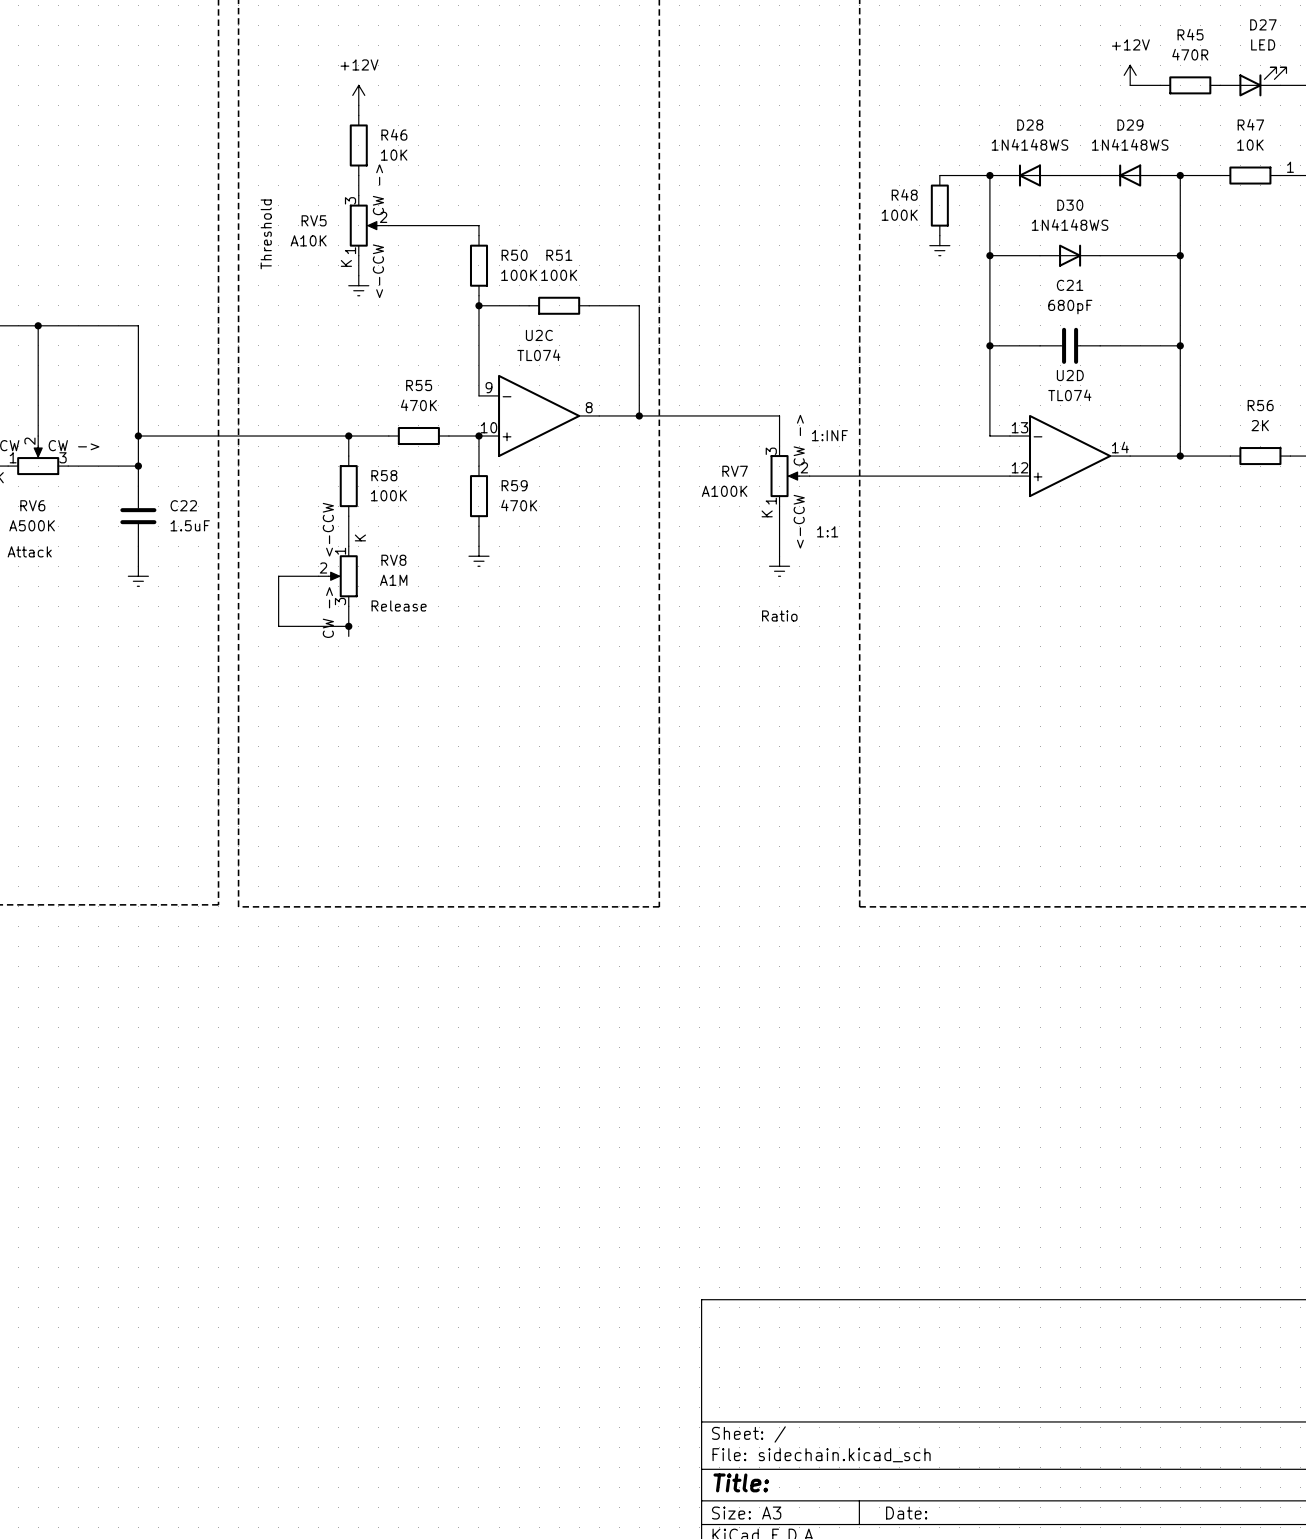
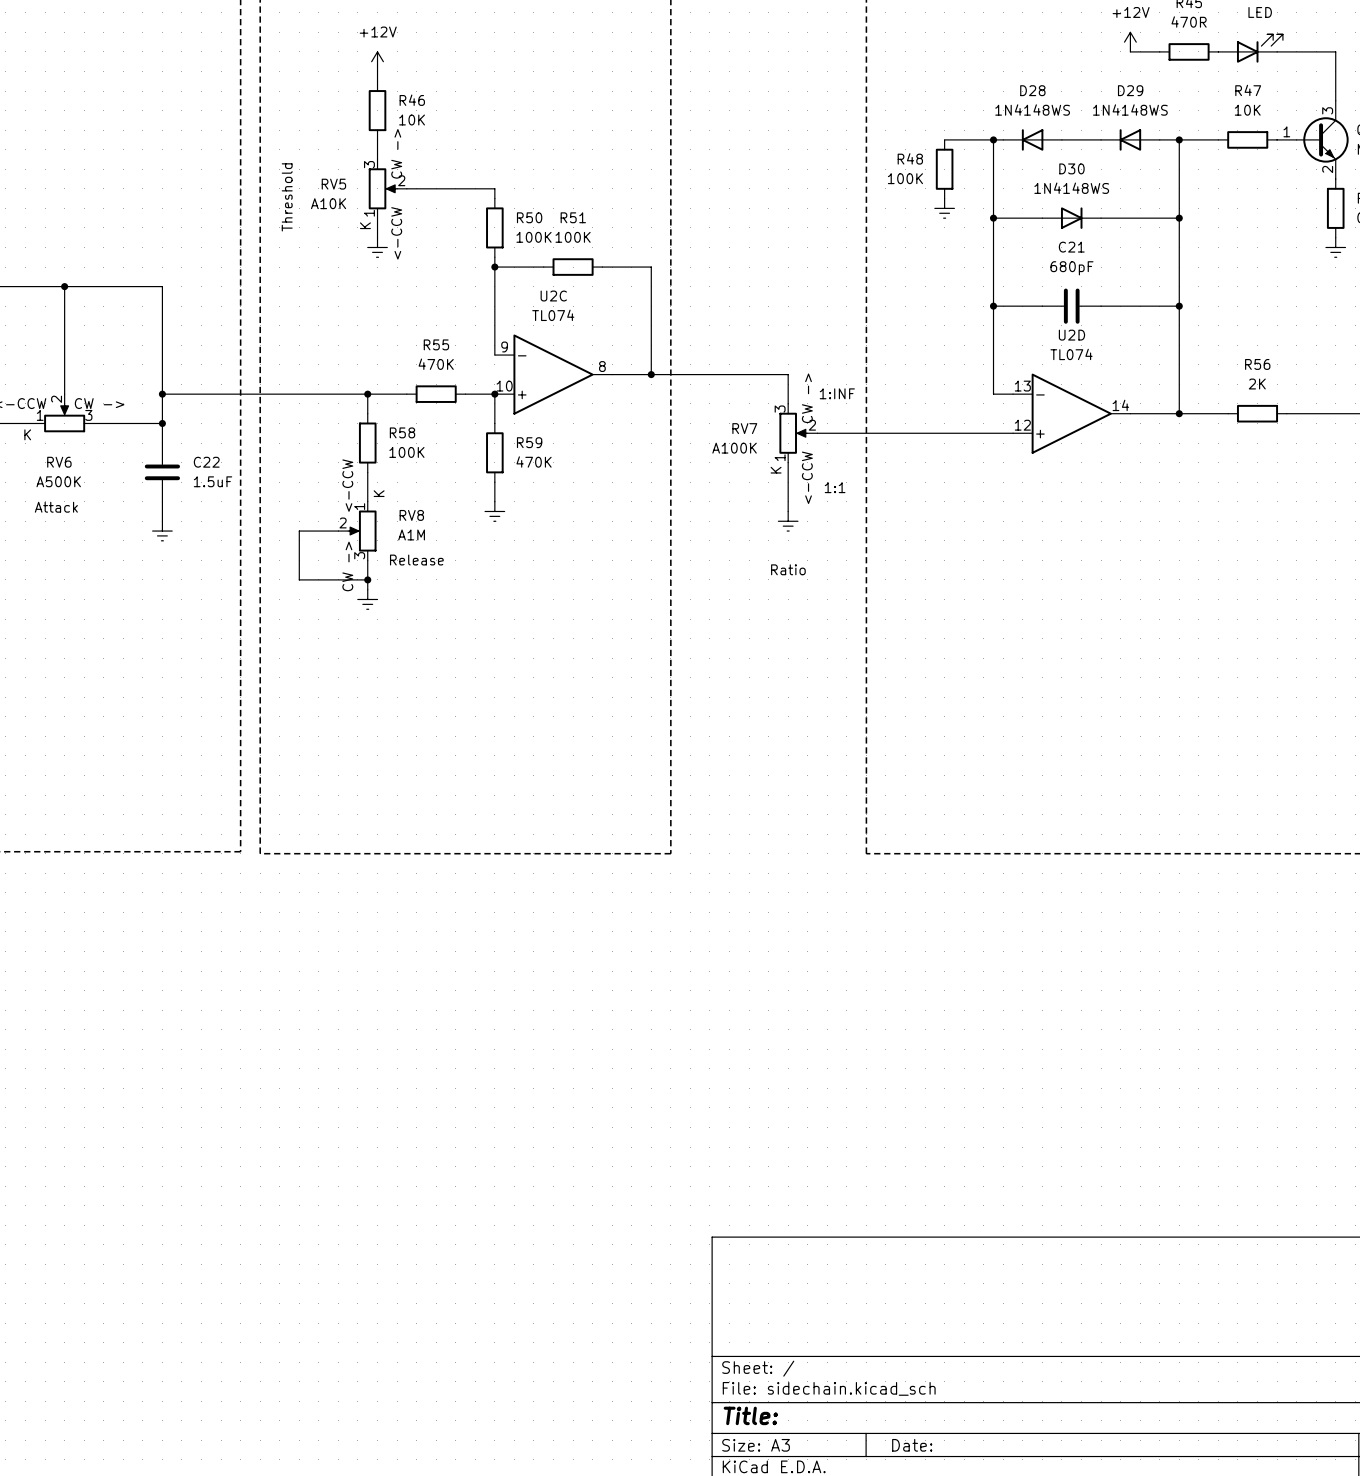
power symbol: none -> (367, 599)

